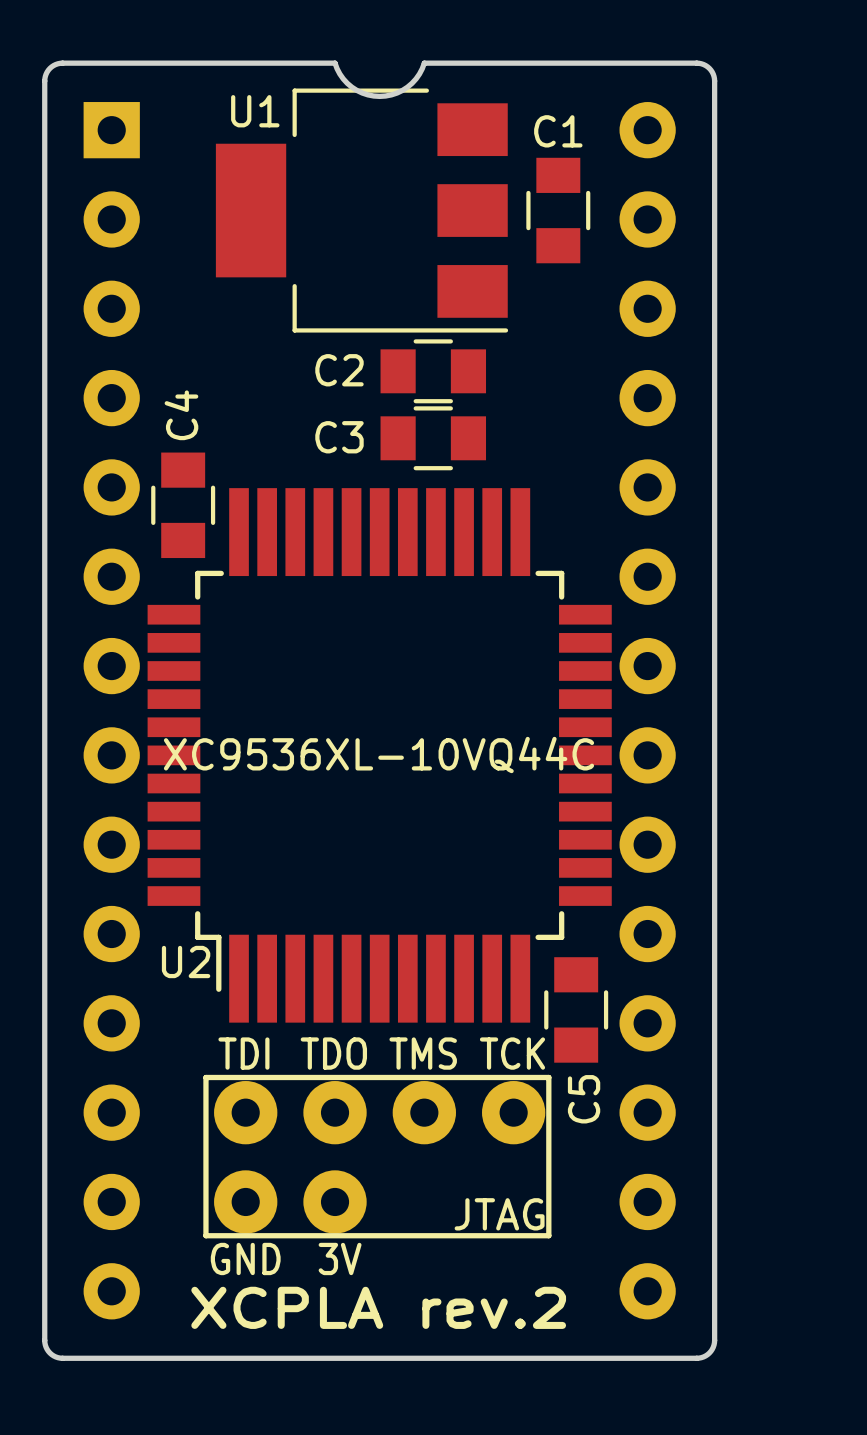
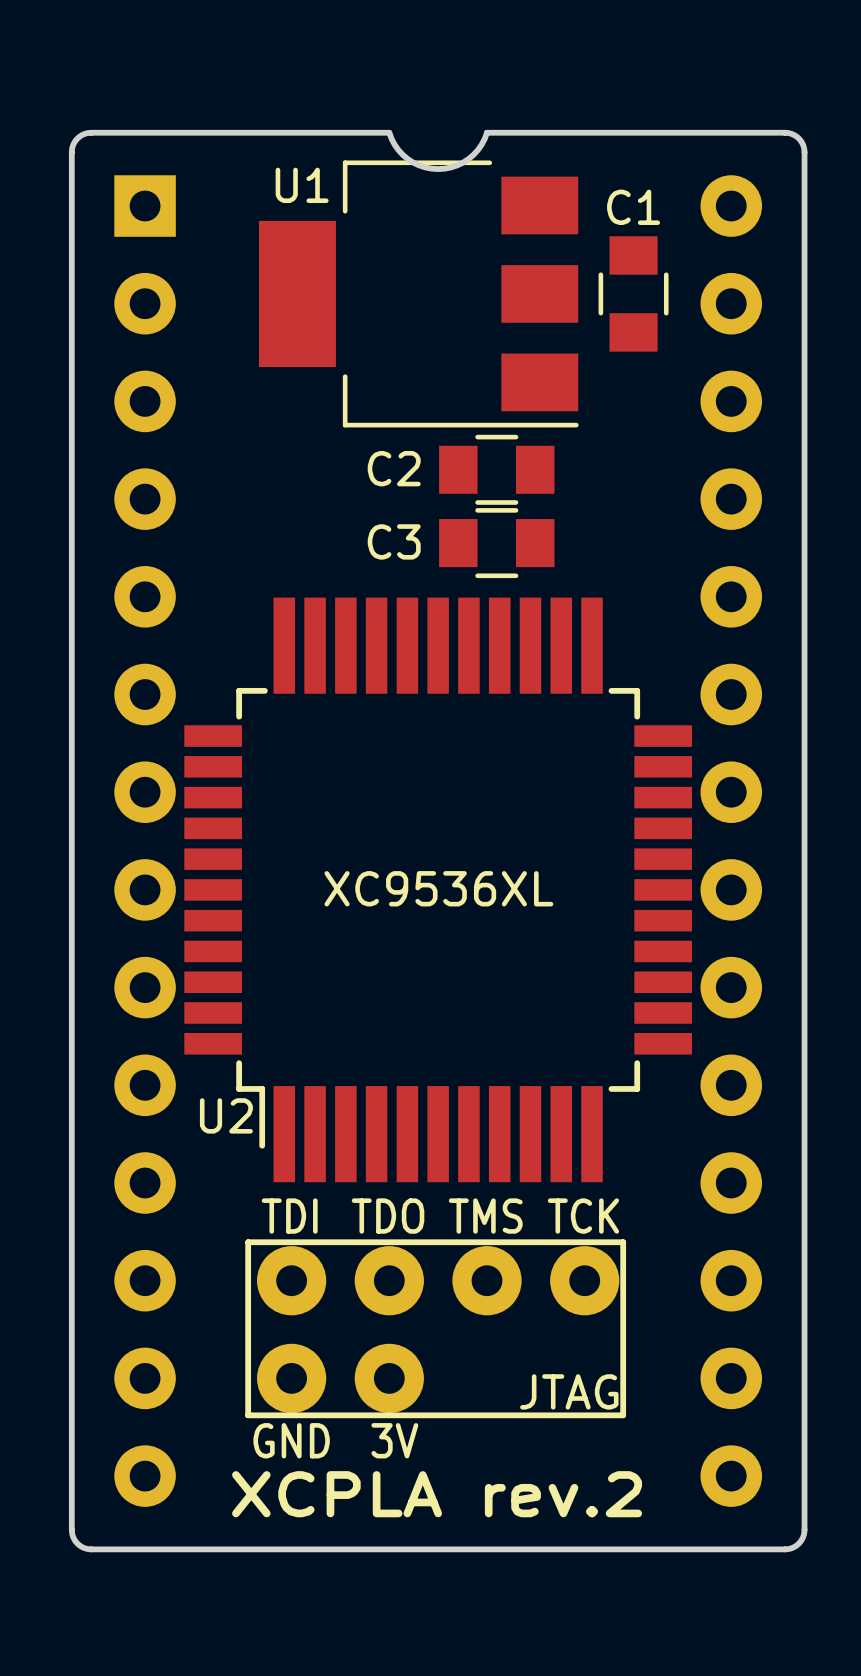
C4: (183, 505) -> none
U2 value: XC9536XL-10VQ44C (379, 755) -> XC9536XL (438, 888)
C5: (576, 1009) -> none

